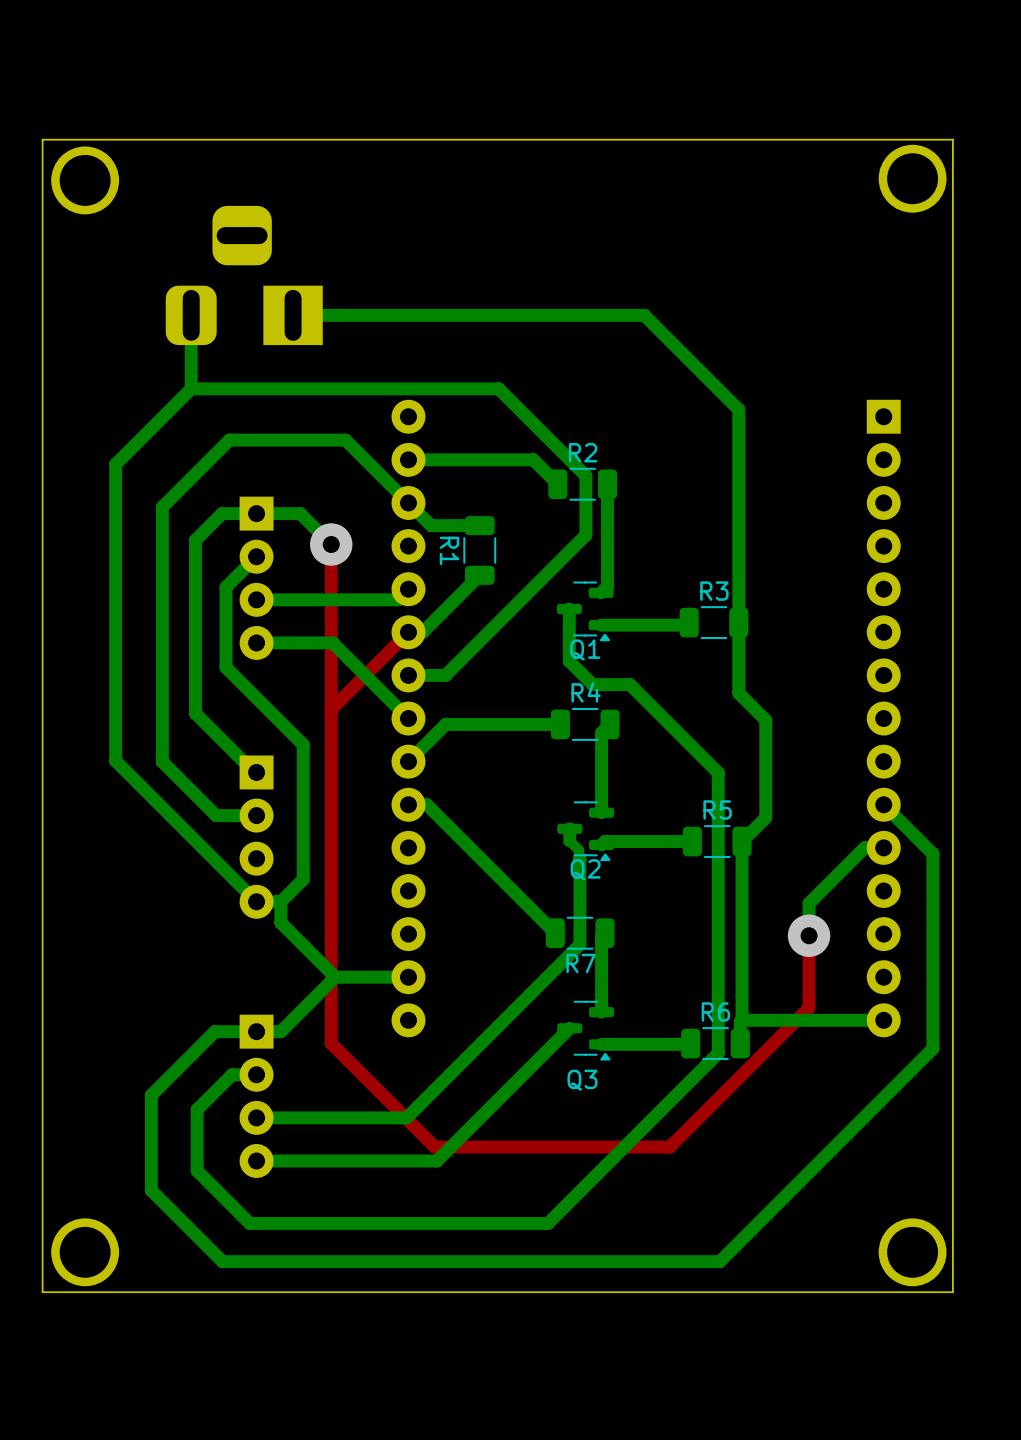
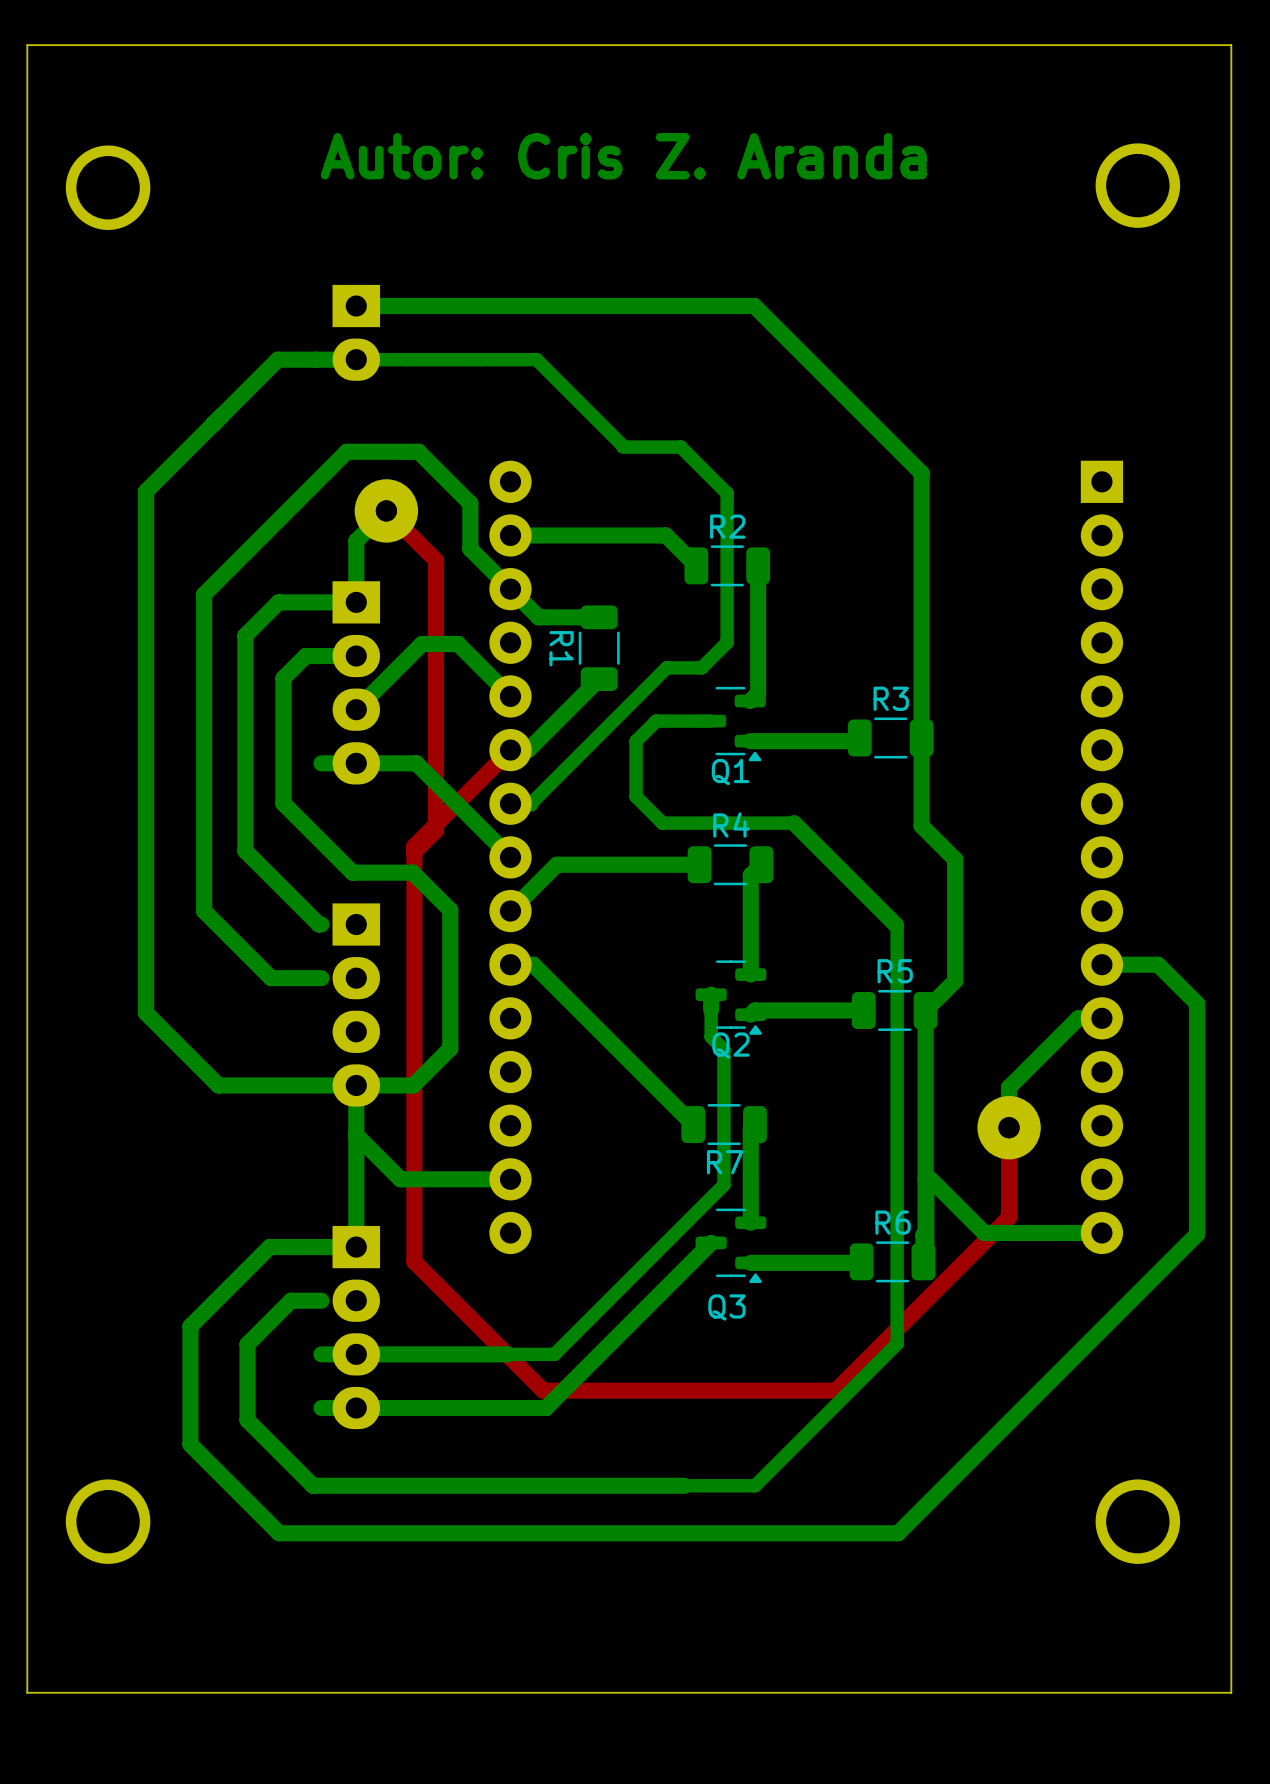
board edge: (952, 139) (42, 139) (42, 1292) (952, 1292) (952, 139) -> (1231, 45) (1231, 1692) (27, 1692) (27, 45) (1231, 45)
text: none -> Autor: Cris Z. Aranda (623, 156)
part: (244, 275) -> none
part: none -> (356, 332)
bottom track: (191, 315) (191, 388) -> none
bottom track: (644, 315) (293, 315) -> (804, 355) (754, 306) (356, 306)
bottom track: (191, 388) (498, 388) (585, 475) (585, 535) (445, 675) (424, 675) -> (146, 541) (146, 491) (277, 359) (536, 359) (622, 447) (680, 447) (727, 493) (727, 642) (701, 667) (666, 667) (530, 803)
bottom track: (191, 388) (115, 464) -> none
bottom track: (229, 440) (345, 440) (376, 470) -> (287, 510) (346, 451) (418, 451) (470, 503) (470, 548)
top track: none -> (386, 510) (436, 560) (436, 830) (414, 852)
part: none -> (386, 510)
bottom track: (284, 513) (300, 513) (331, 544) -> (356, 602) (356, 541) (386, 510)
top track: (331, 544) (331, 709) -> none
via: (331, 544) -> none
bottom track: (256, 556) (226, 587) -> (356, 656) (305, 656) (283, 678) (283, 694)
part: (256, 578) -> none
part: none -> (356, 682)
bottom track: (408, 589) (397, 599) (256, 599) -> (510, 696) (458, 643) (421, 643) (356, 709)
bottom track: (569, 609) (569, 661) (592, 684) (629, 684) (636, 690) -> (710, 721) (656, 721) (636, 741) (636, 796) (662, 823) (794, 823)
bottom track: (226, 667) (303, 744) (303, 879) (280, 901) (280, 922) (335, 977) (280, 1031) -> (283, 793) (283, 803) (352, 872) (412, 872) (450, 910) (450, 1048) (413, 1085) (351, 1085)
bottom track: (115, 760) (256, 901) -> (146, 910) (146, 1013) (218, 1085) (321, 1085)
bottom track: (718, 772) (718, 1053) (548, 1223) -> (895, 925) (897, 1343) (755, 1485) (684, 1485)
bottom track: (883, 804) (932, 853) (932, 1048) -> (1101, 964) (1158, 964) (1196, 1003) (1196, 1234) (1163, 1268)
part: (256, 837) -> none
part: none -> (356, 1004)
bottom track: (569, 840) (579, 850) (579, 944) (406, 1117) -> (711, 1009) (711, 1036) (723, 1049) (723, 1184) (554, 1354) (508, 1354)
bottom track: none -> (356, 1085) (356, 1247) (351, 1247)
part: none -> (1009, 1127)
bottom track: none -> (356, 1135) (400, 1179) (419, 1179)
bottom track: (789, 1020) (742, 1020) -> (984, 1232) (930, 1178) (925, 1178) (926, 1261)
part: (256, 1096) -> none
part: none -> (356, 1327)

